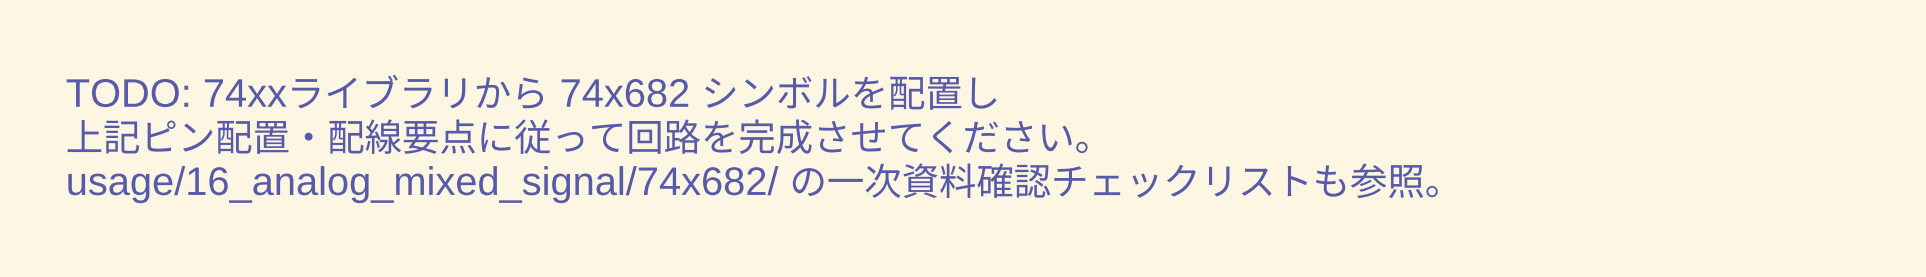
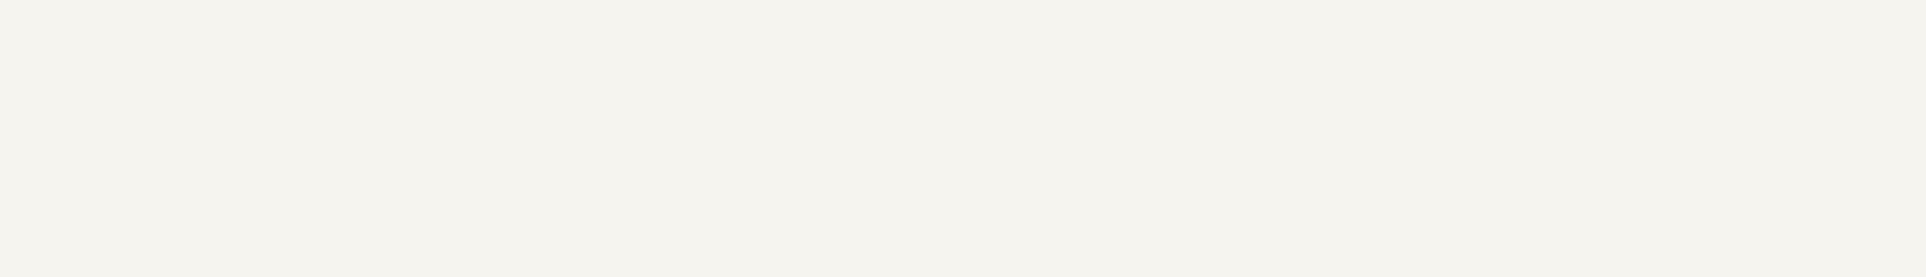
text: TODO: 74xxライブラリから 74x682 シンボルを配置し (531, 92) -> none
text: 上記ピン配置・配線要点に従って回路を完成させてください。 (577, 136) -> none
text: usage/16_analog_mixed_signal/74x682/ の一次資料確認チェックリストも参照。 (753, 183) -> none

